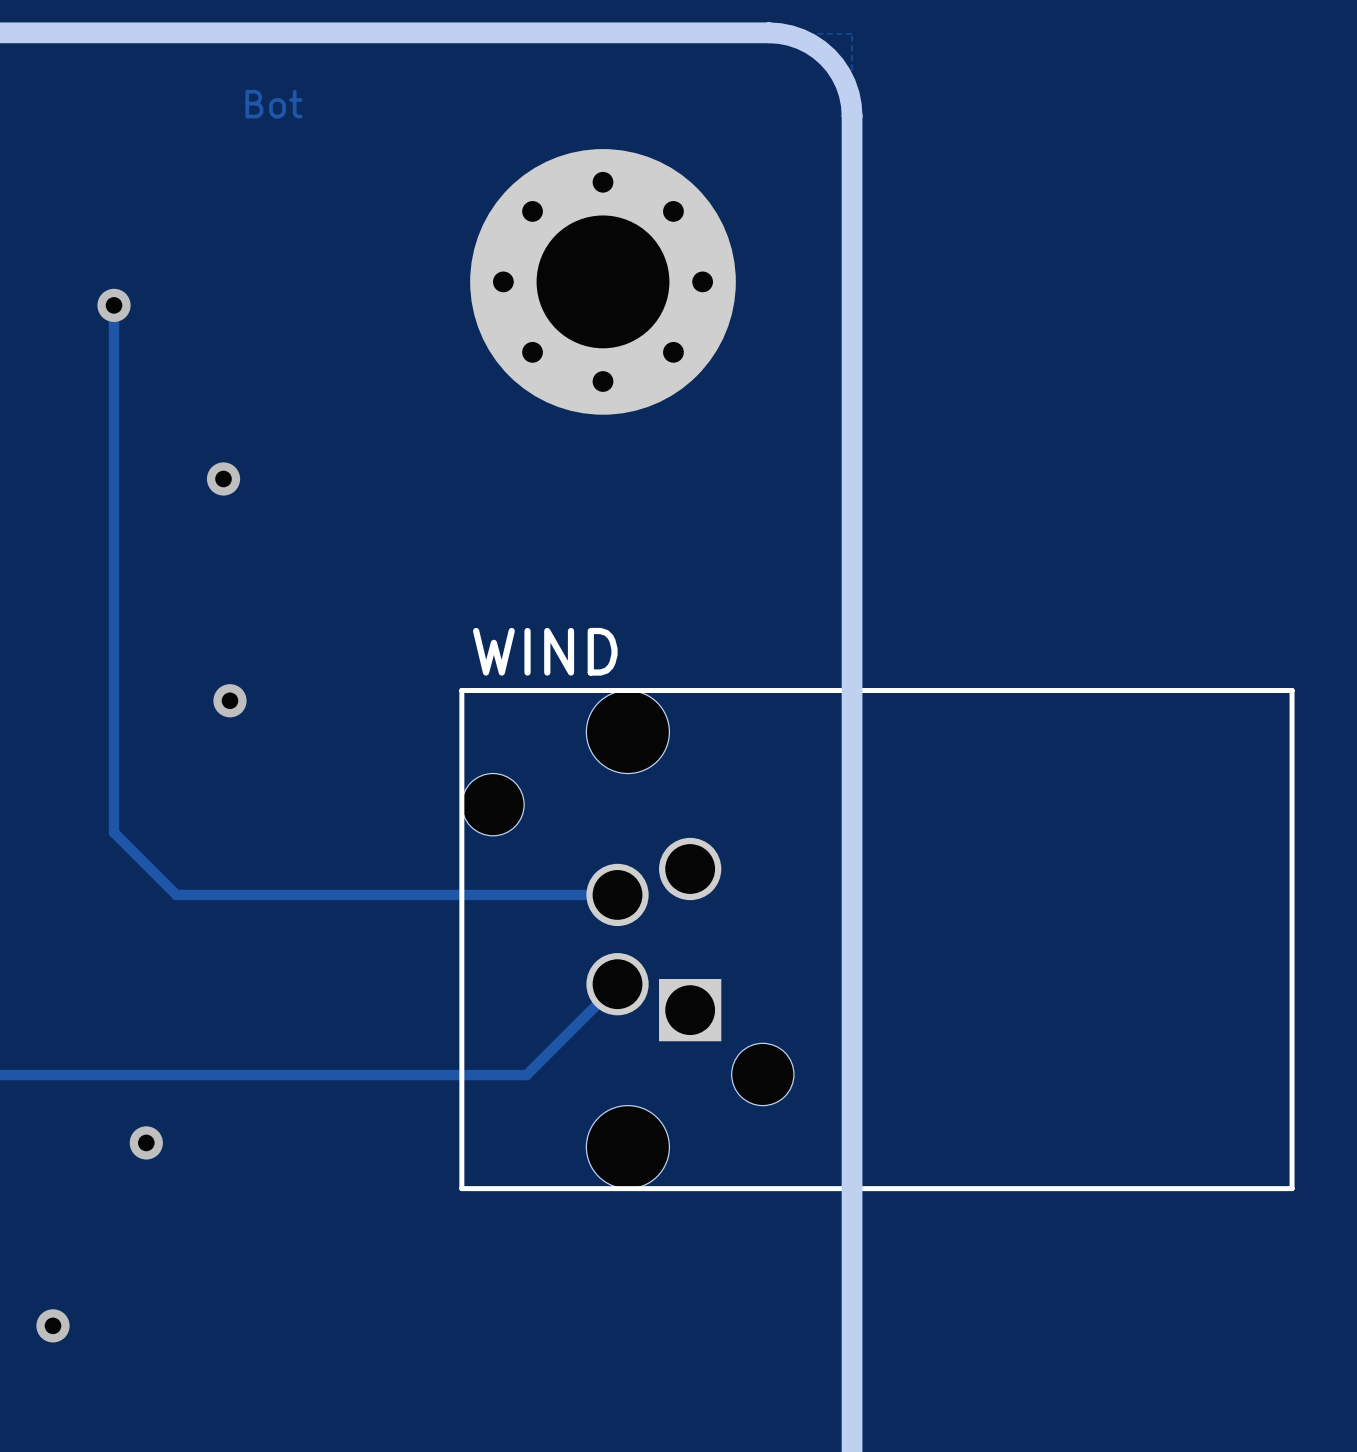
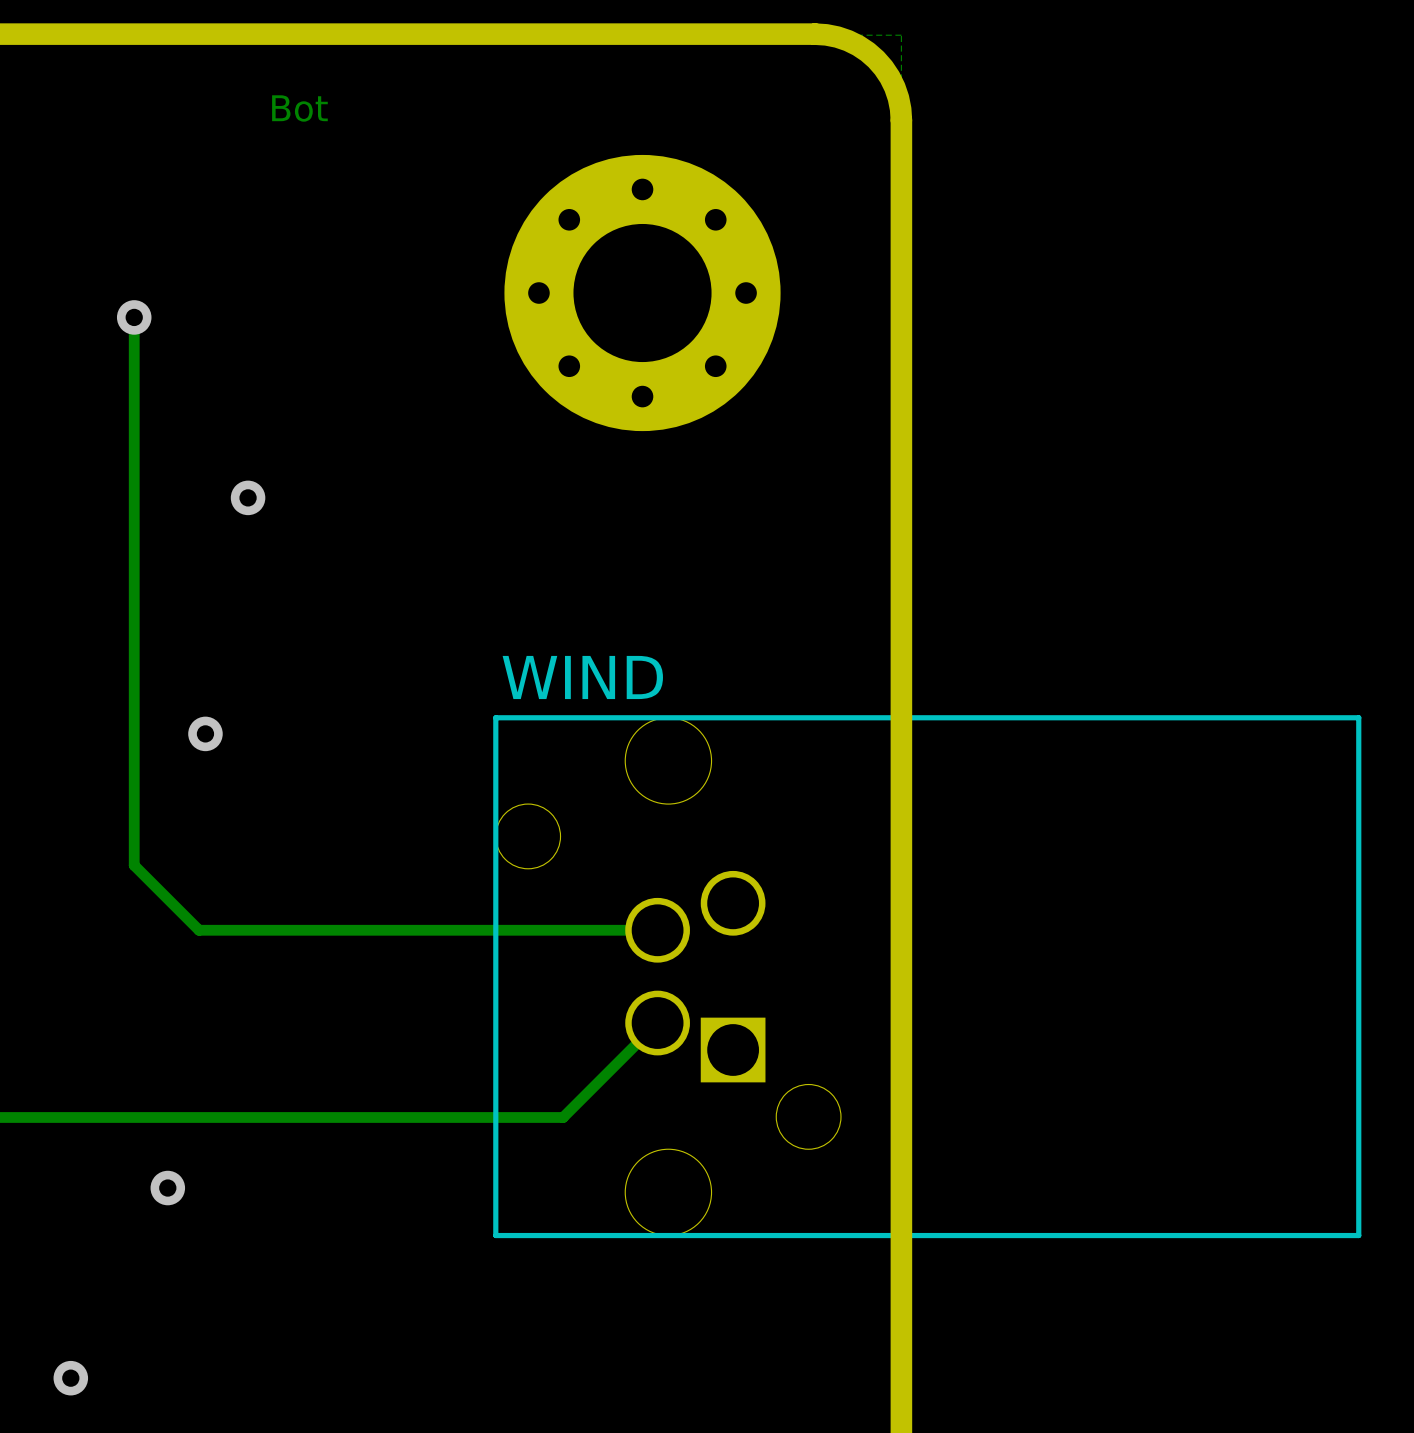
via position: (229, 700) -> (205, 733)

